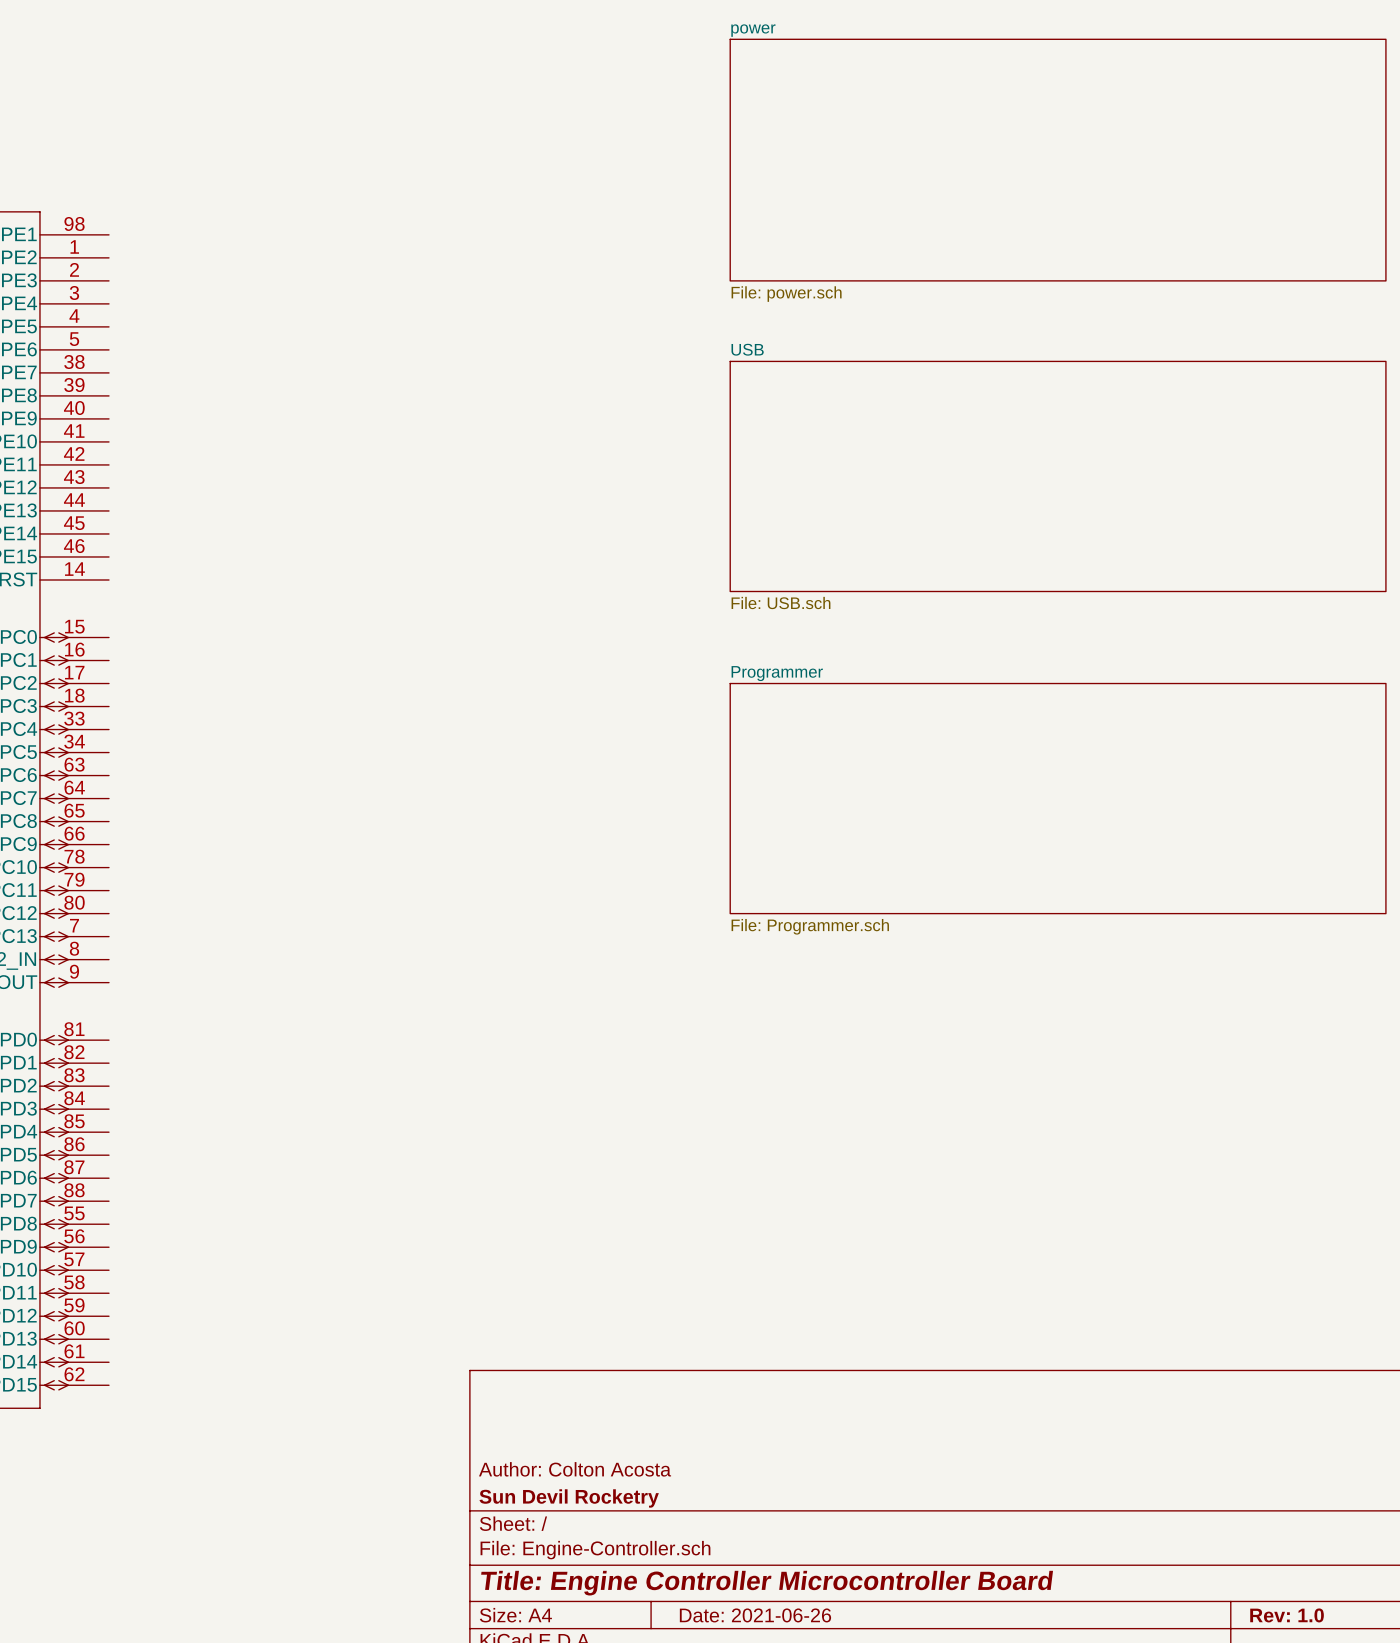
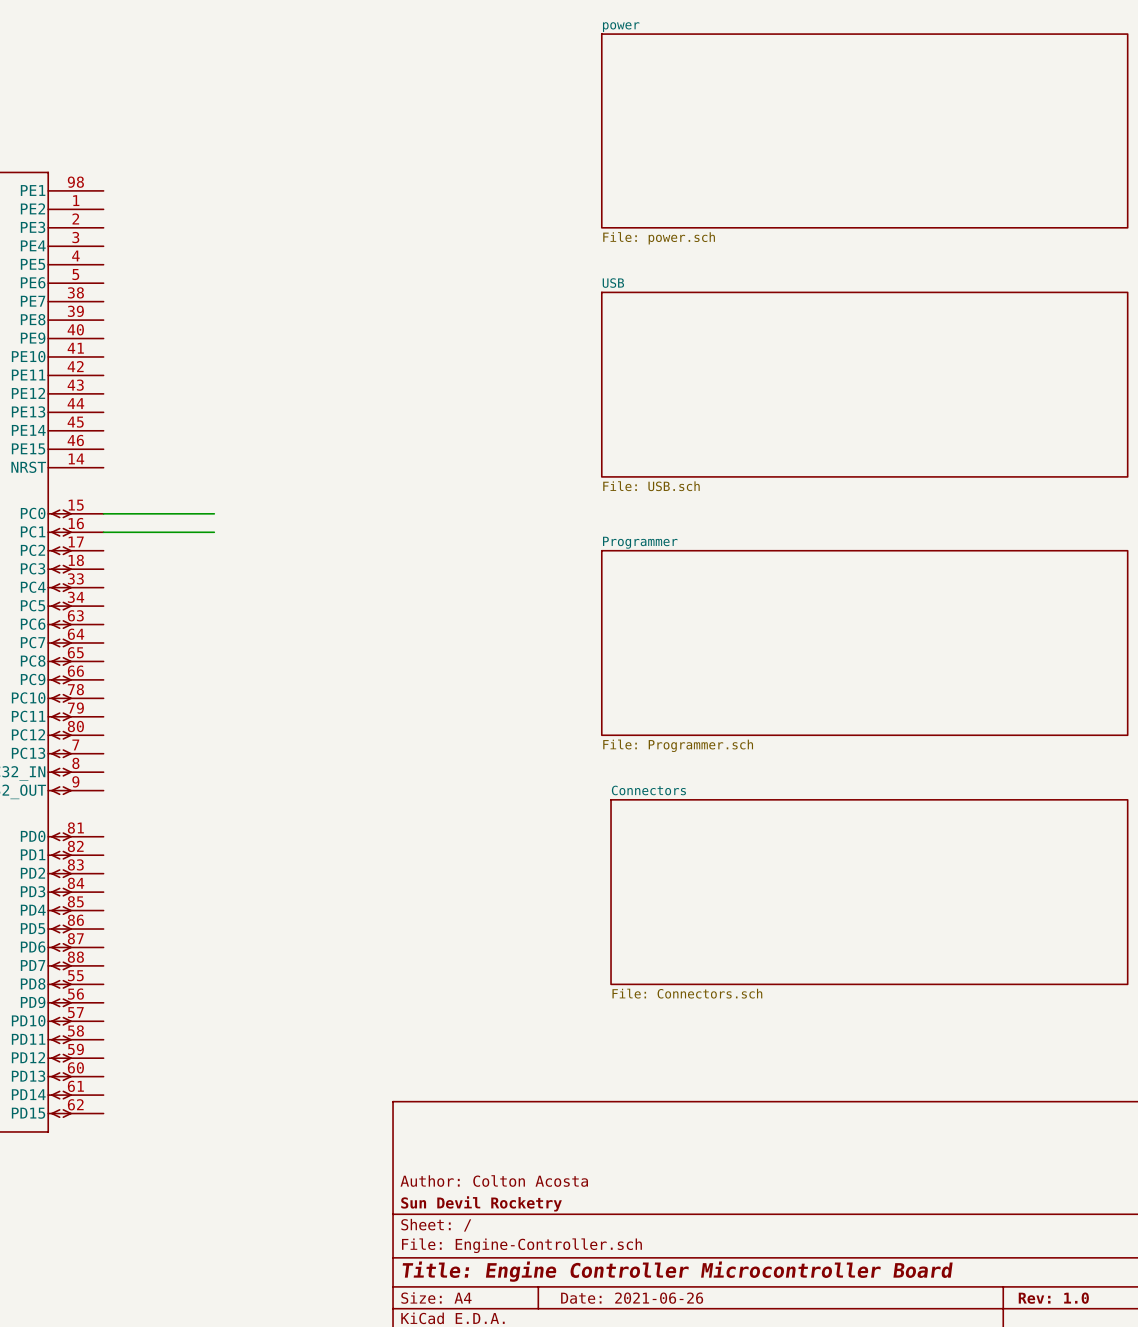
wire: none -> (103, 513) (214, 513)
wire: none -> (103, 532) (214, 532)
sheet Connectors: none -> File: Connectors.sch (869, 892)

